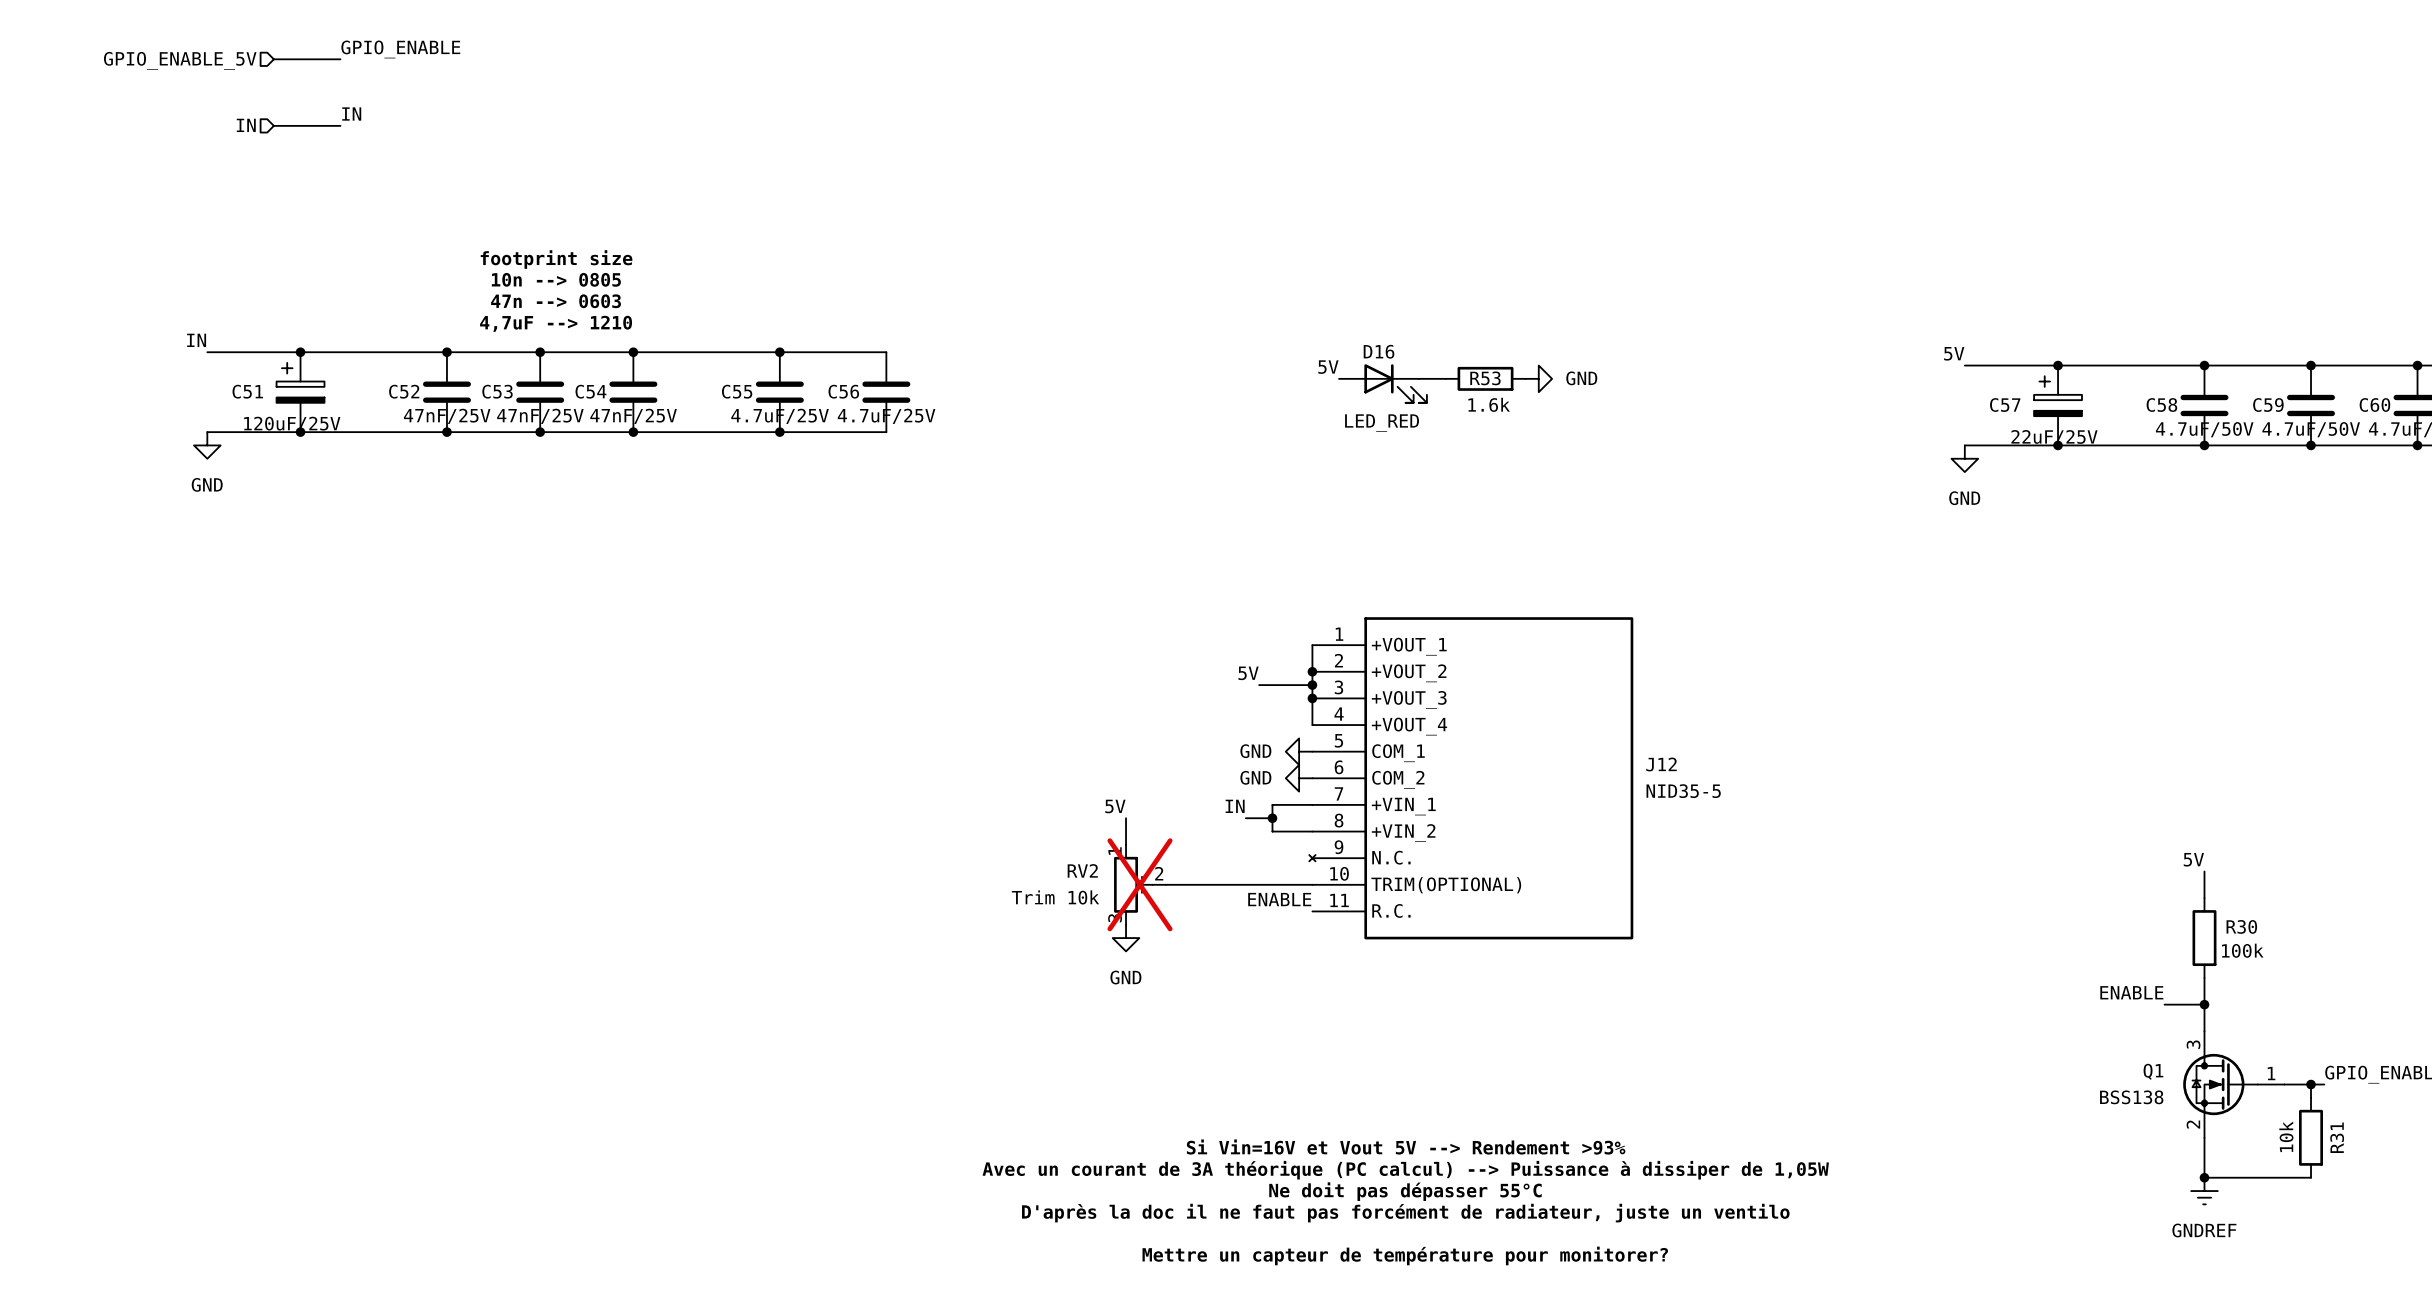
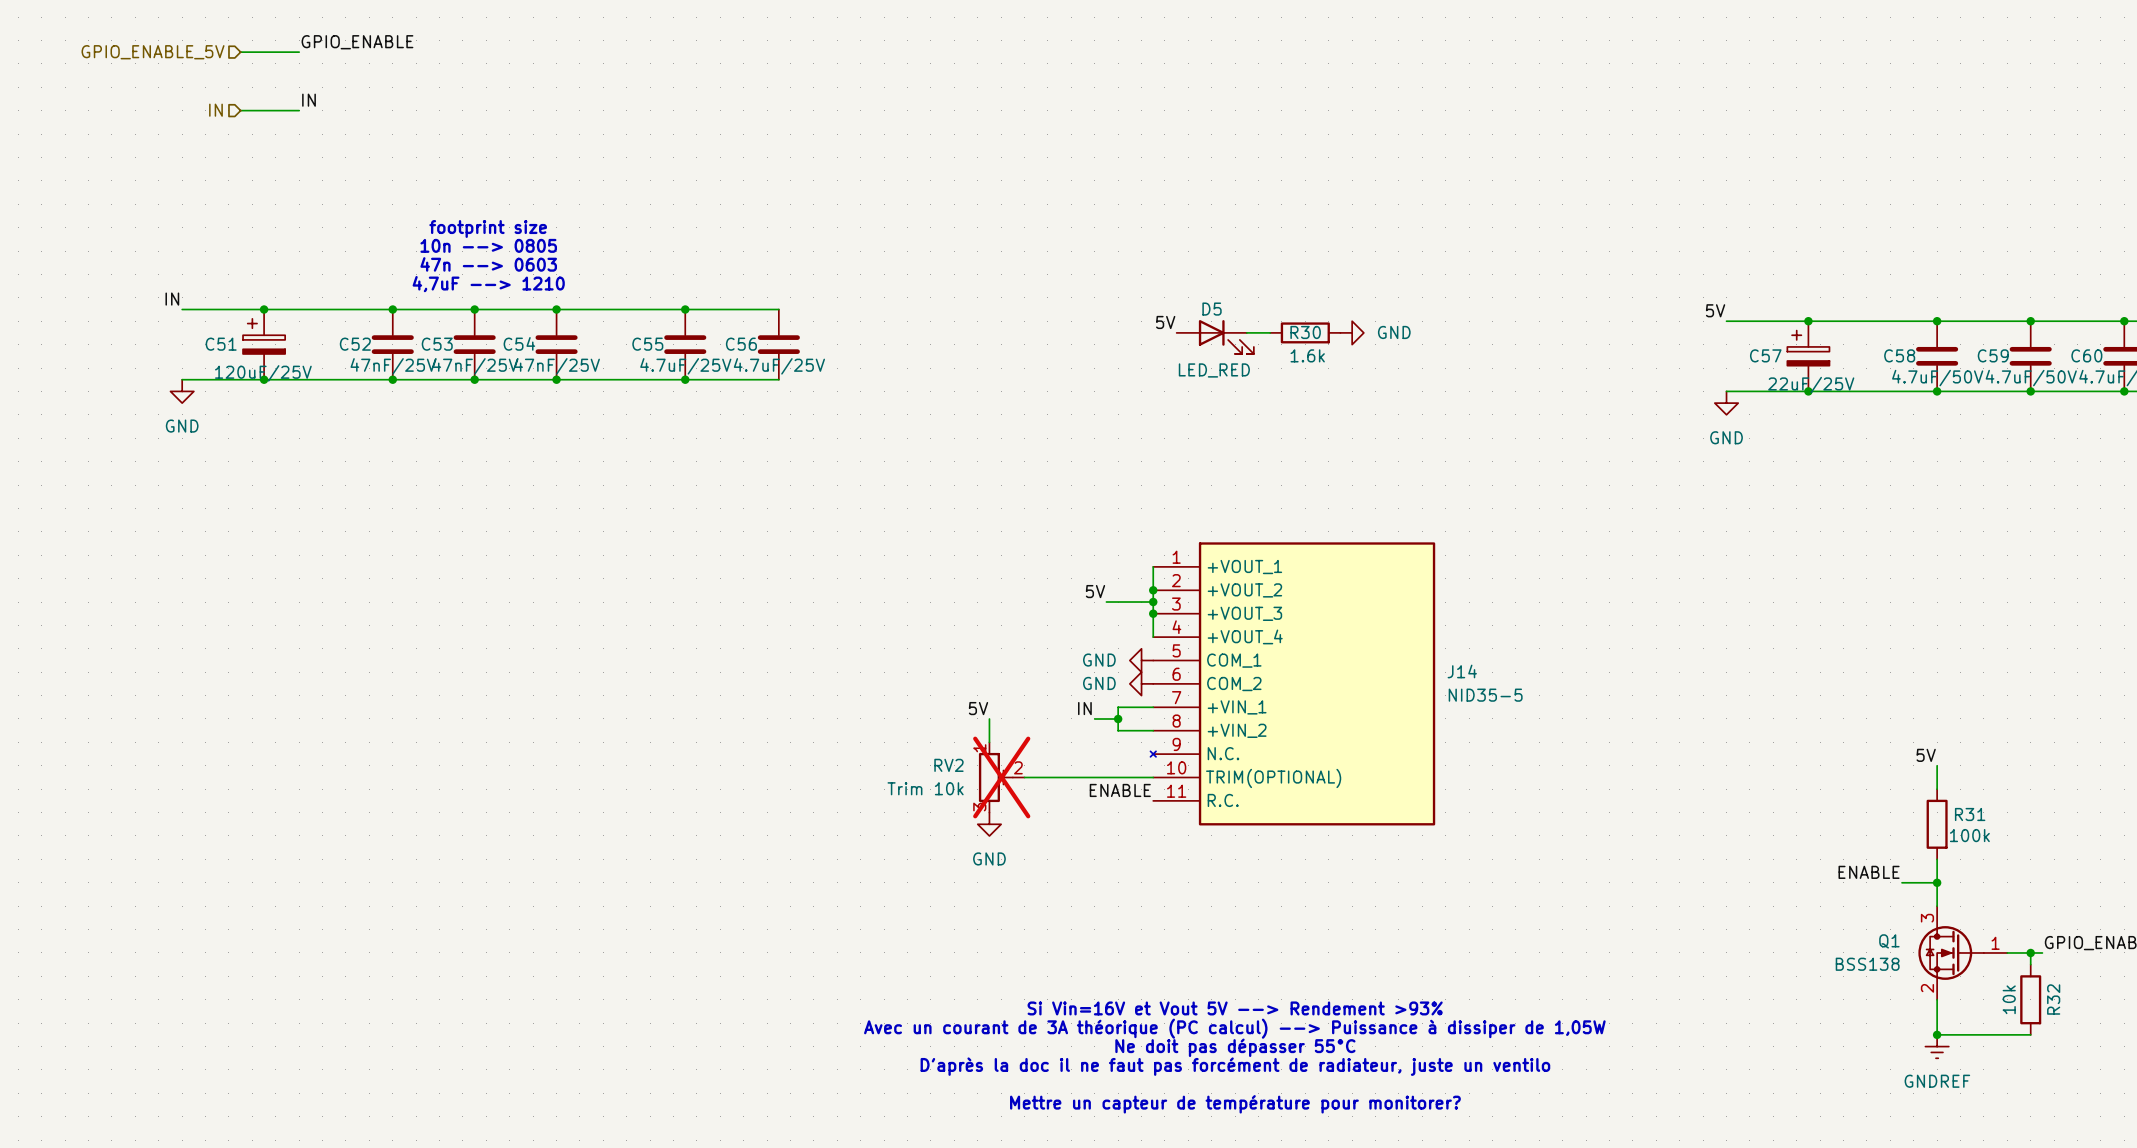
D16 name: D16 (1379, 351) -> D5 (1212, 309)
R53 name: R53 (1485, 378) -> R30 (1305, 332)
J12 name: J12 (1661, 764) -> J14 (1462, 671)
R30 name: R30 (2241, 926) -> R31 (1970, 814)
R31 name: R31 (2337, 1137) -> R32 (2053, 999)

